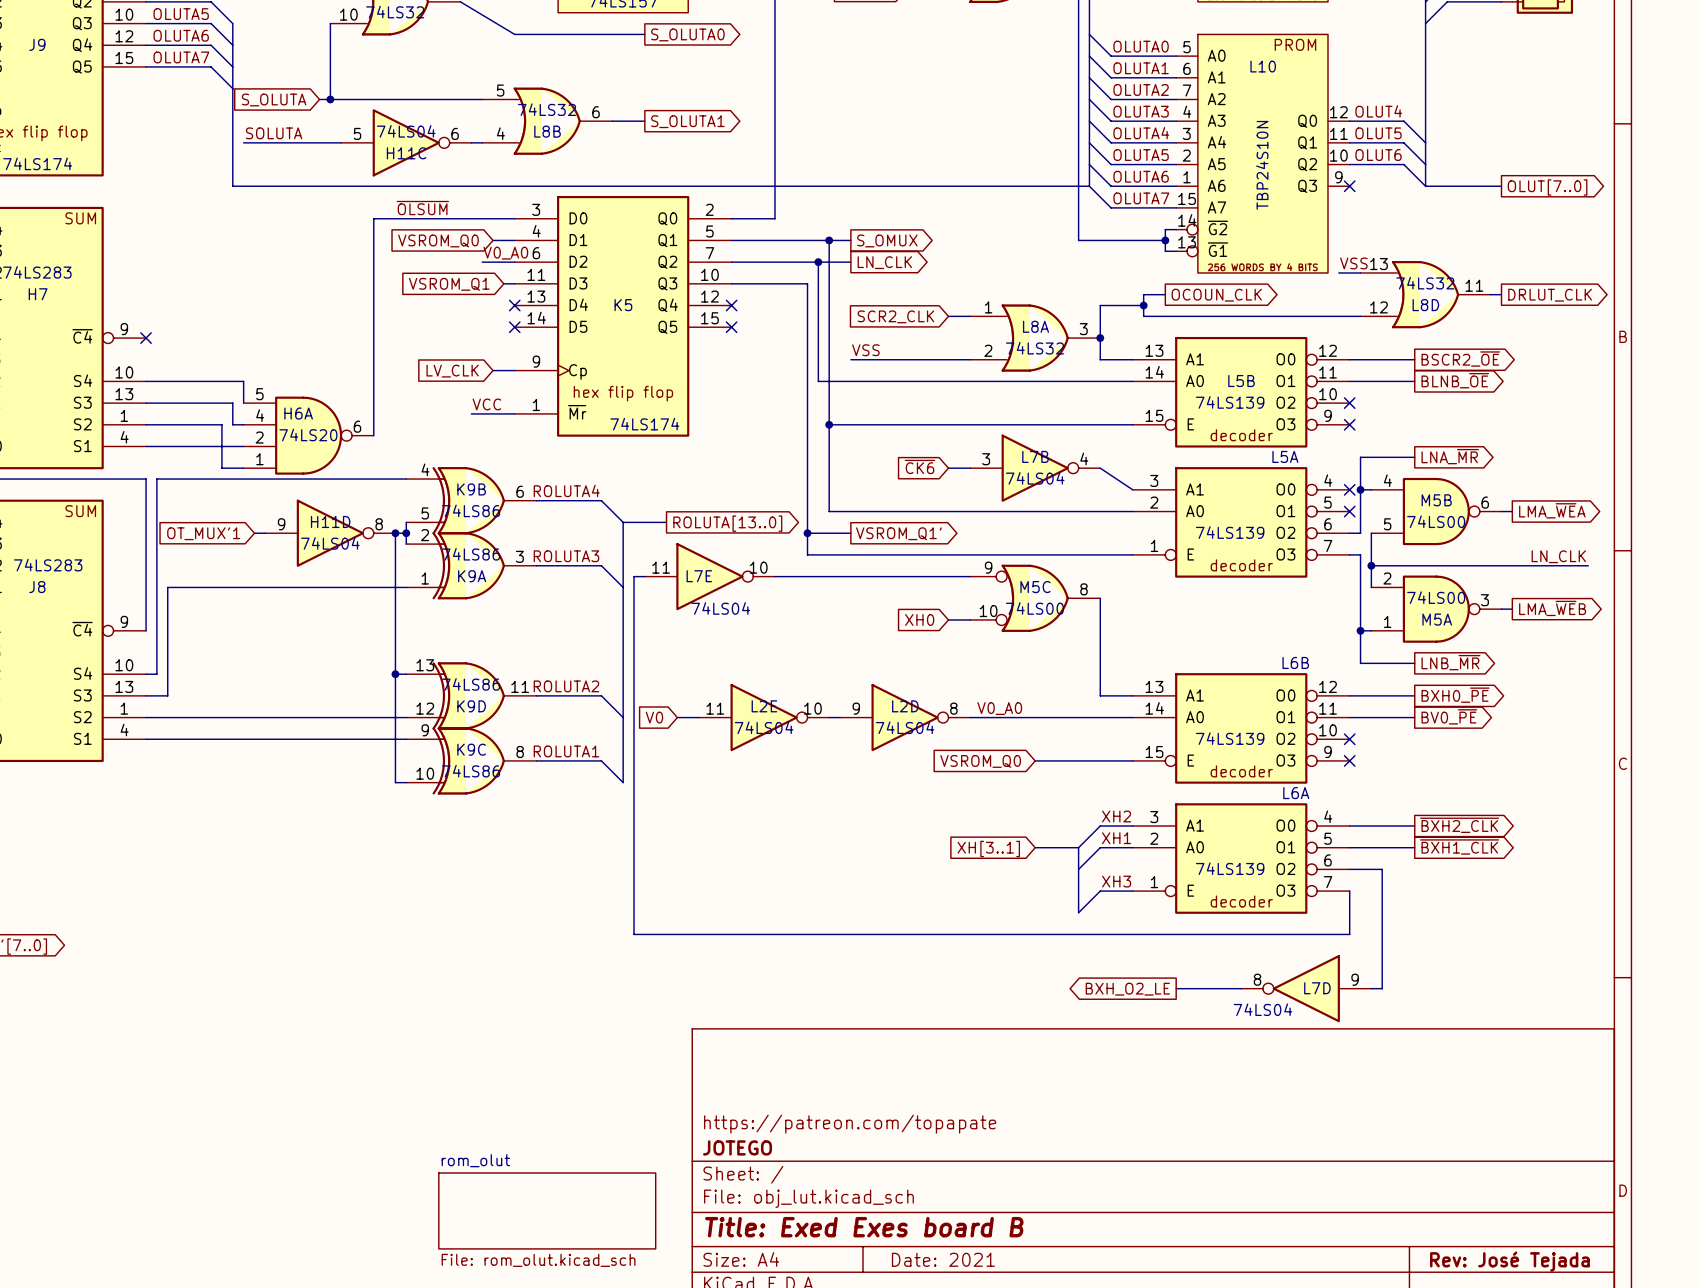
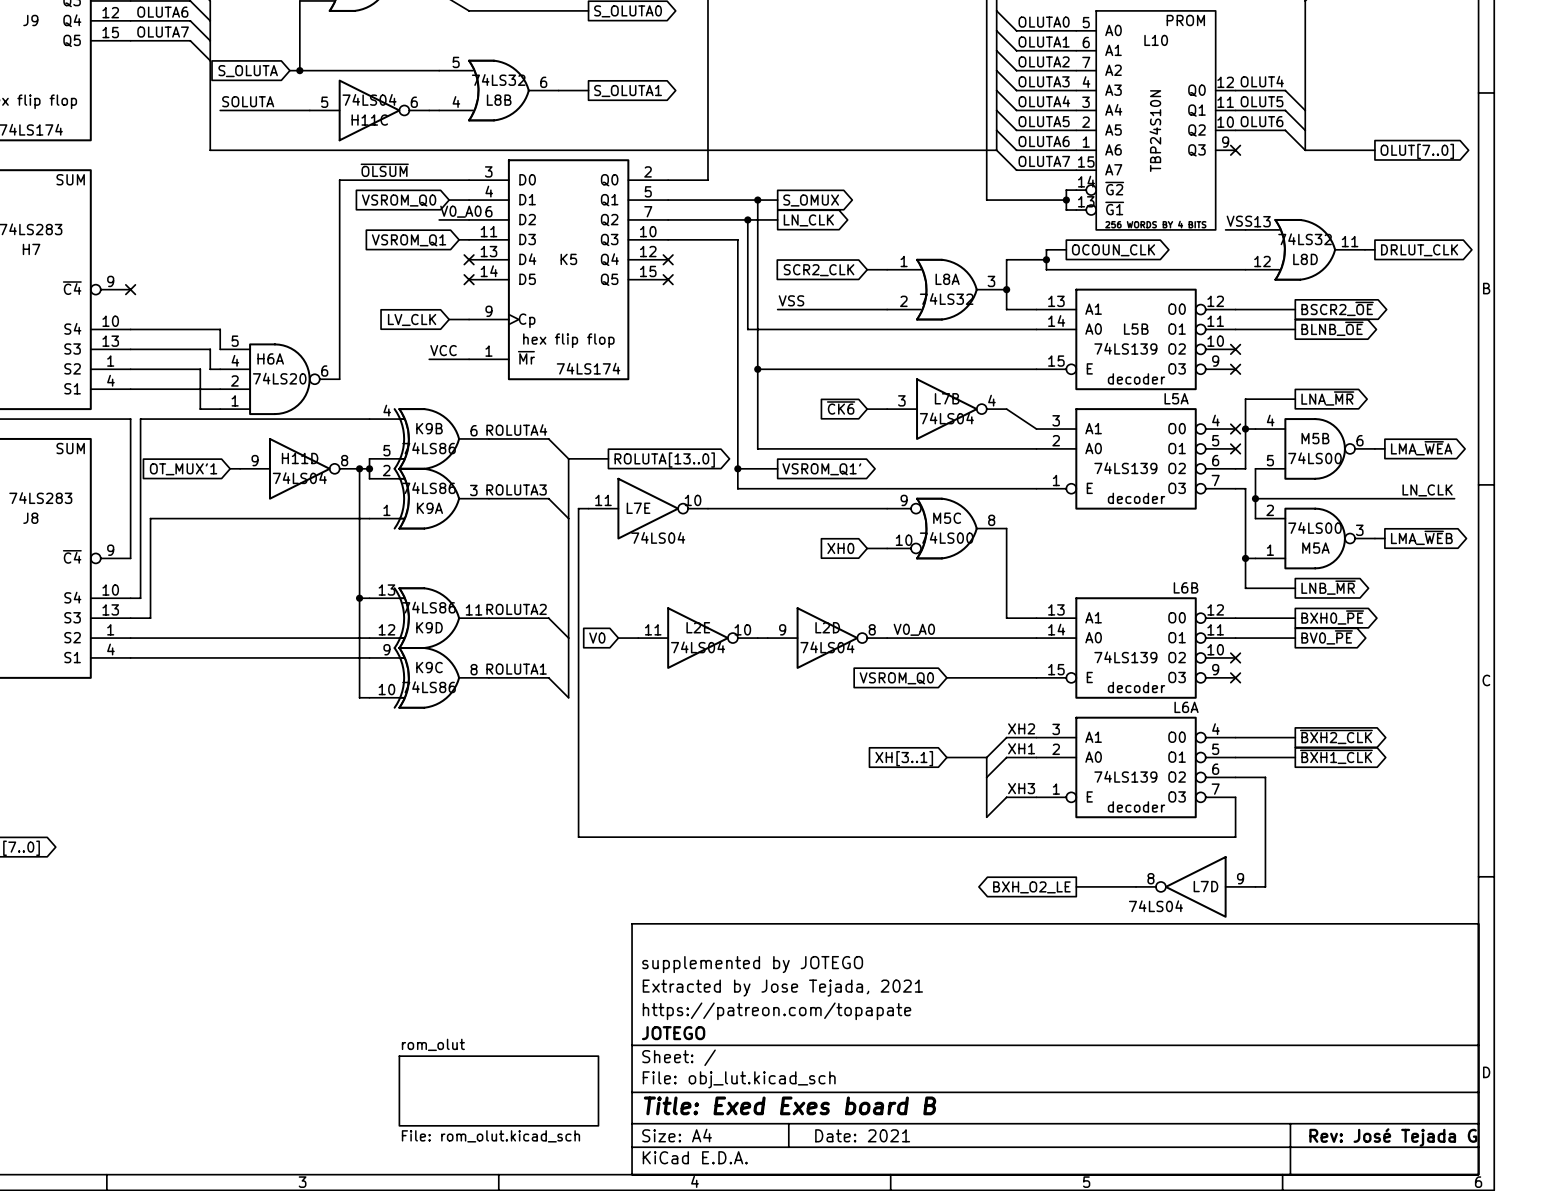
title block: none -> supplemented by JOTEGO (752, 964)
title block: none -> Extracted by Jose Tejada, 2021 (782, 988)
title block: Rev: José Tejada (1509, 1261) -> Rev: José Tejada G (1393, 1137)

